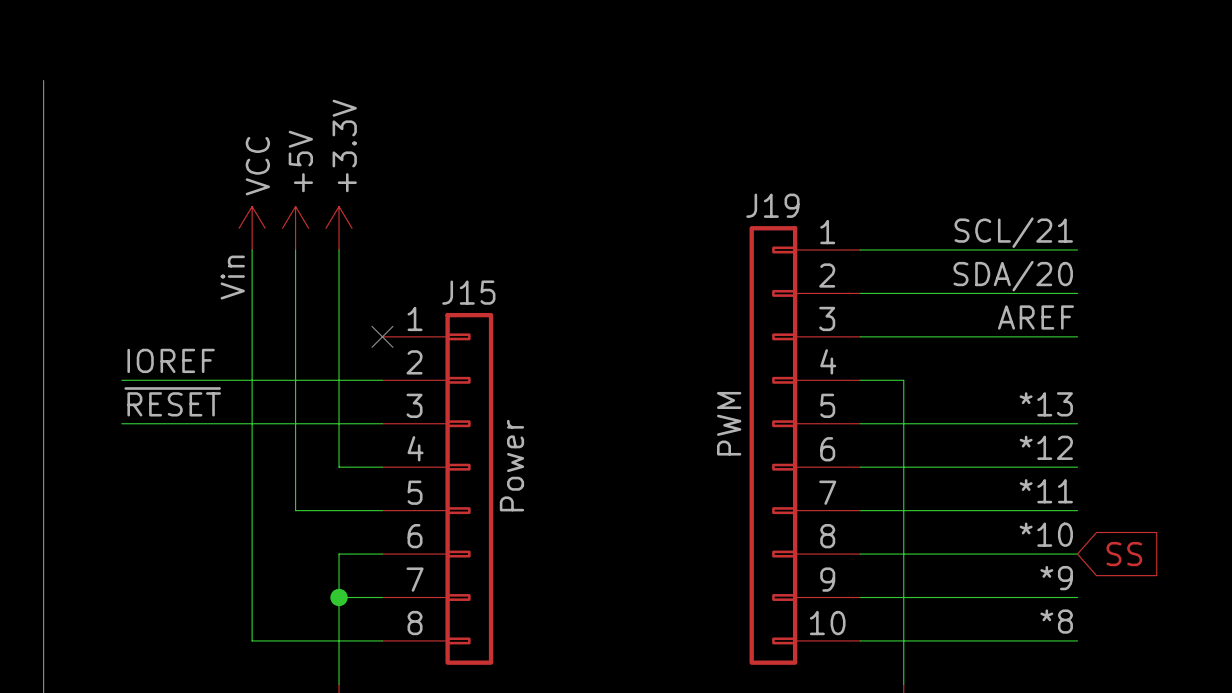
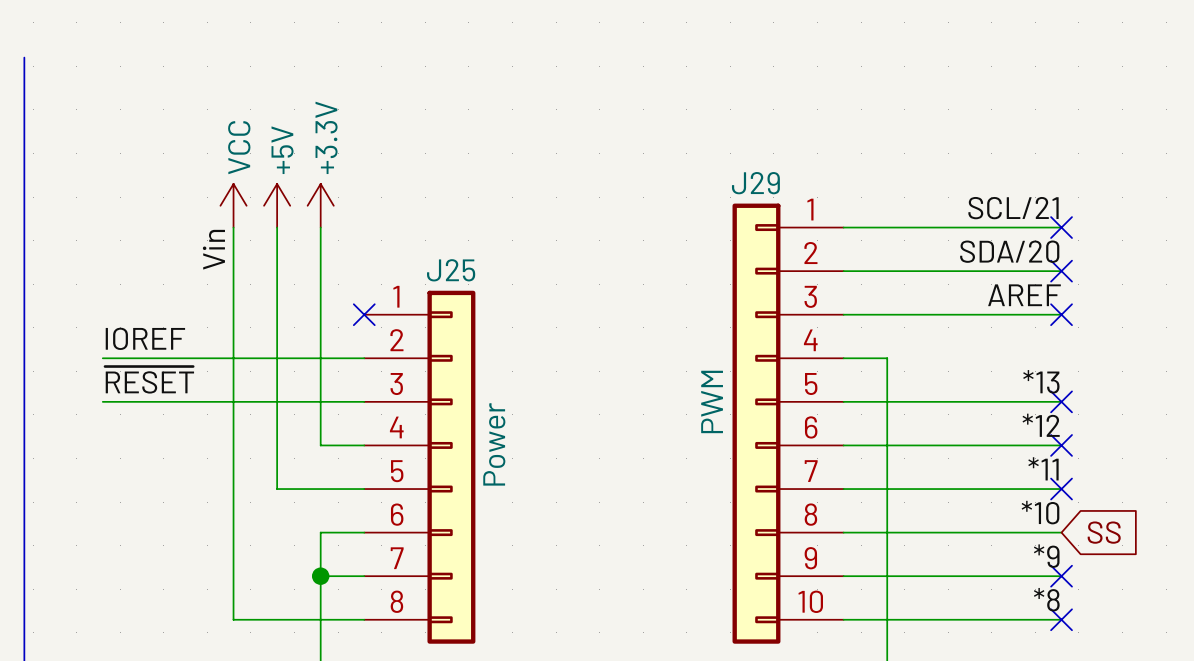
J19 name: J19 (772, 205) -> J29 (755, 183)
no-connect mark: none -> (1061, 227)
J15 name: J15 (468, 292) -> J25 (451, 270)
no-connect mark: none -> (1061, 271)
no-connect mark: none -> (1061, 314)
no-connect mark: none -> (1061, 401)
no-connect mark: none -> (1061, 445)
no-connect mark: none -> (1061, 489)
no-connect mark: none -> (1061, 576)
no-connect mark: none -> (1061, 619)

